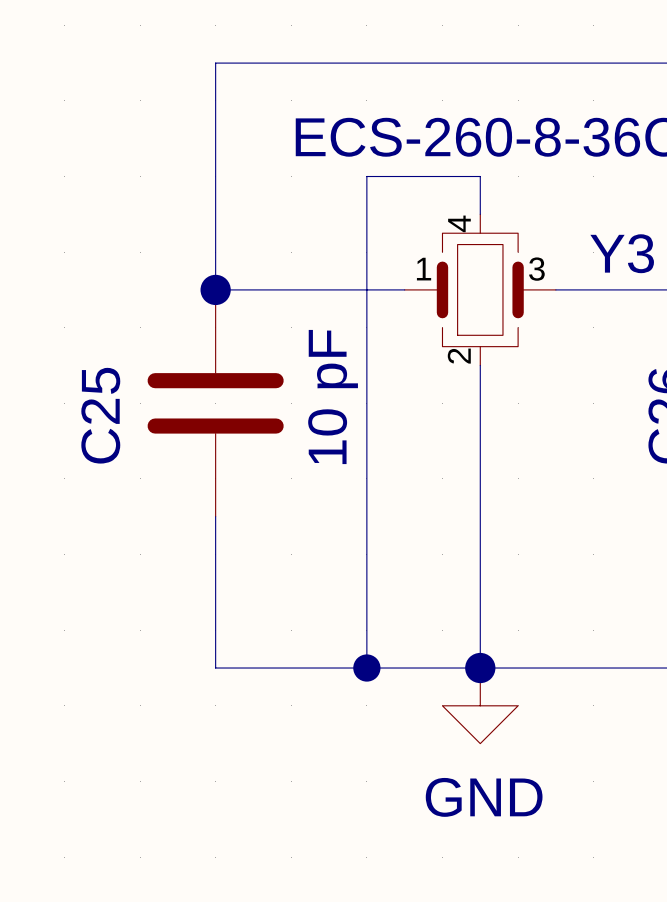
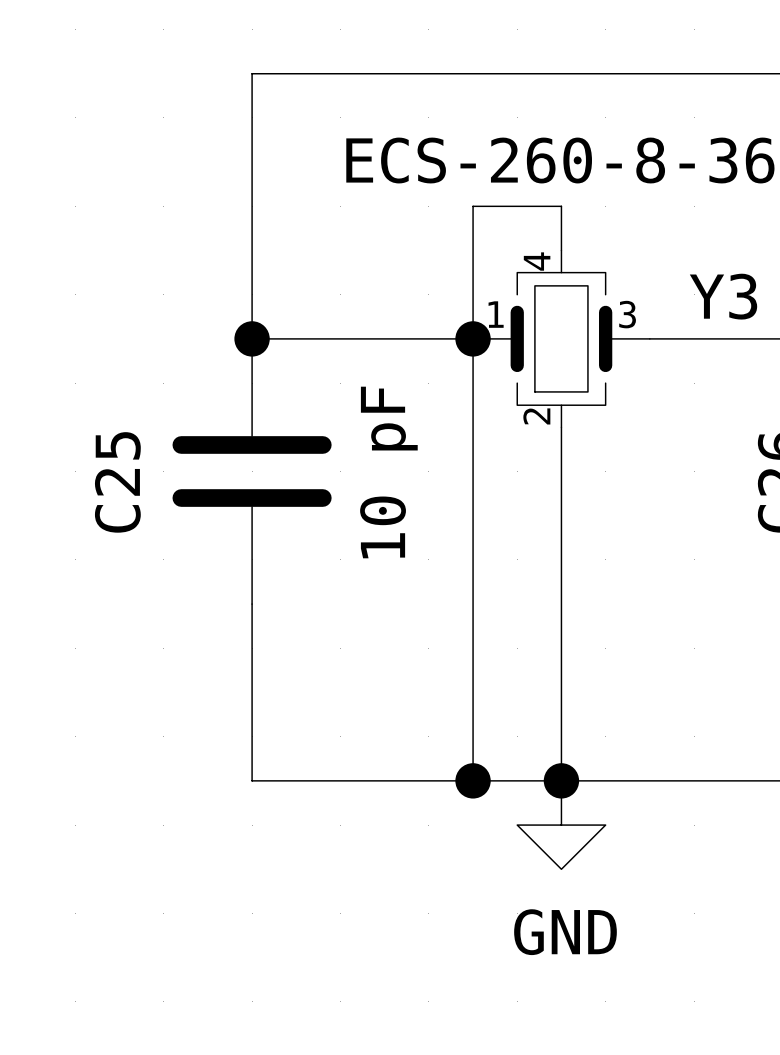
wire: (404, 176) (366, 176) (366, 668) -> (473, 206) (473, 780)
junction: none -> (473, 338)
junction: (366, 668) -> none
junction: none -> (473, 780)

